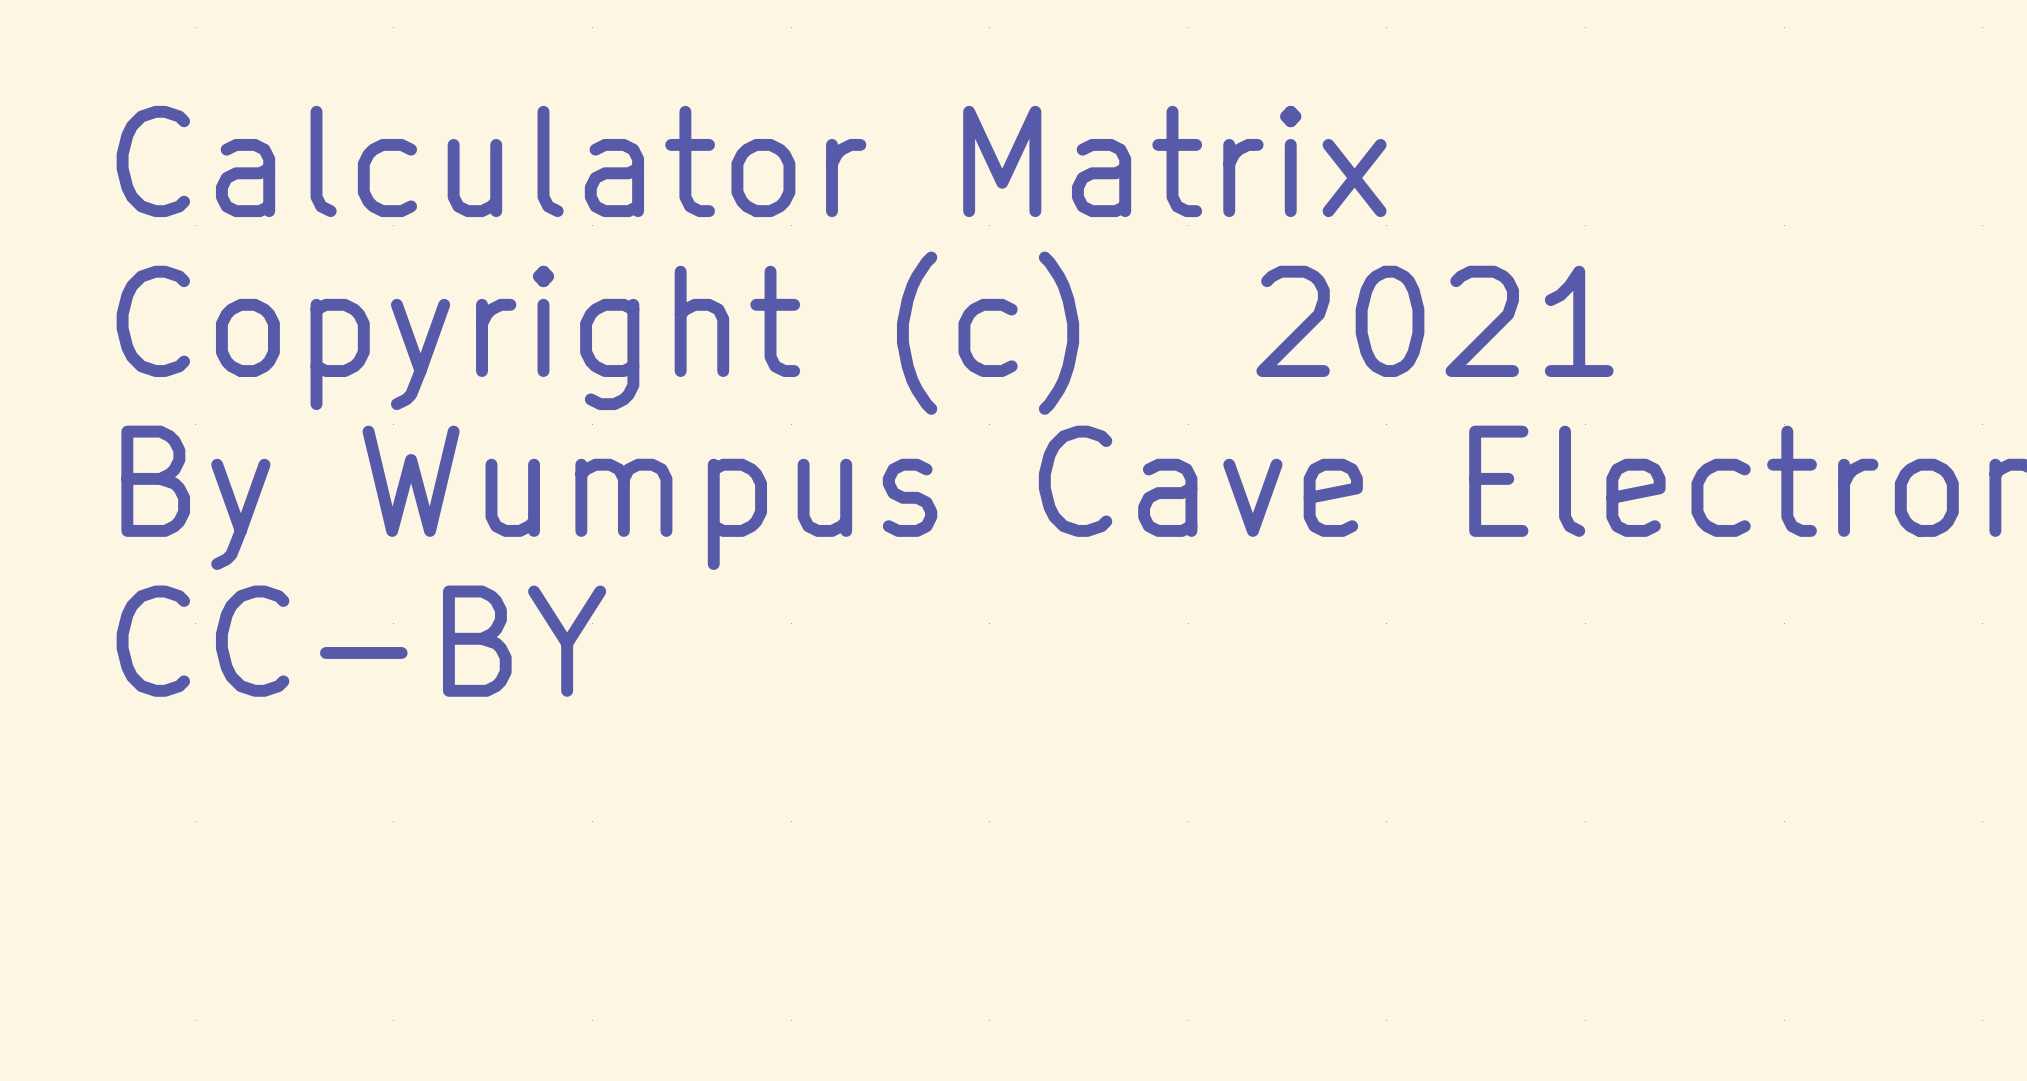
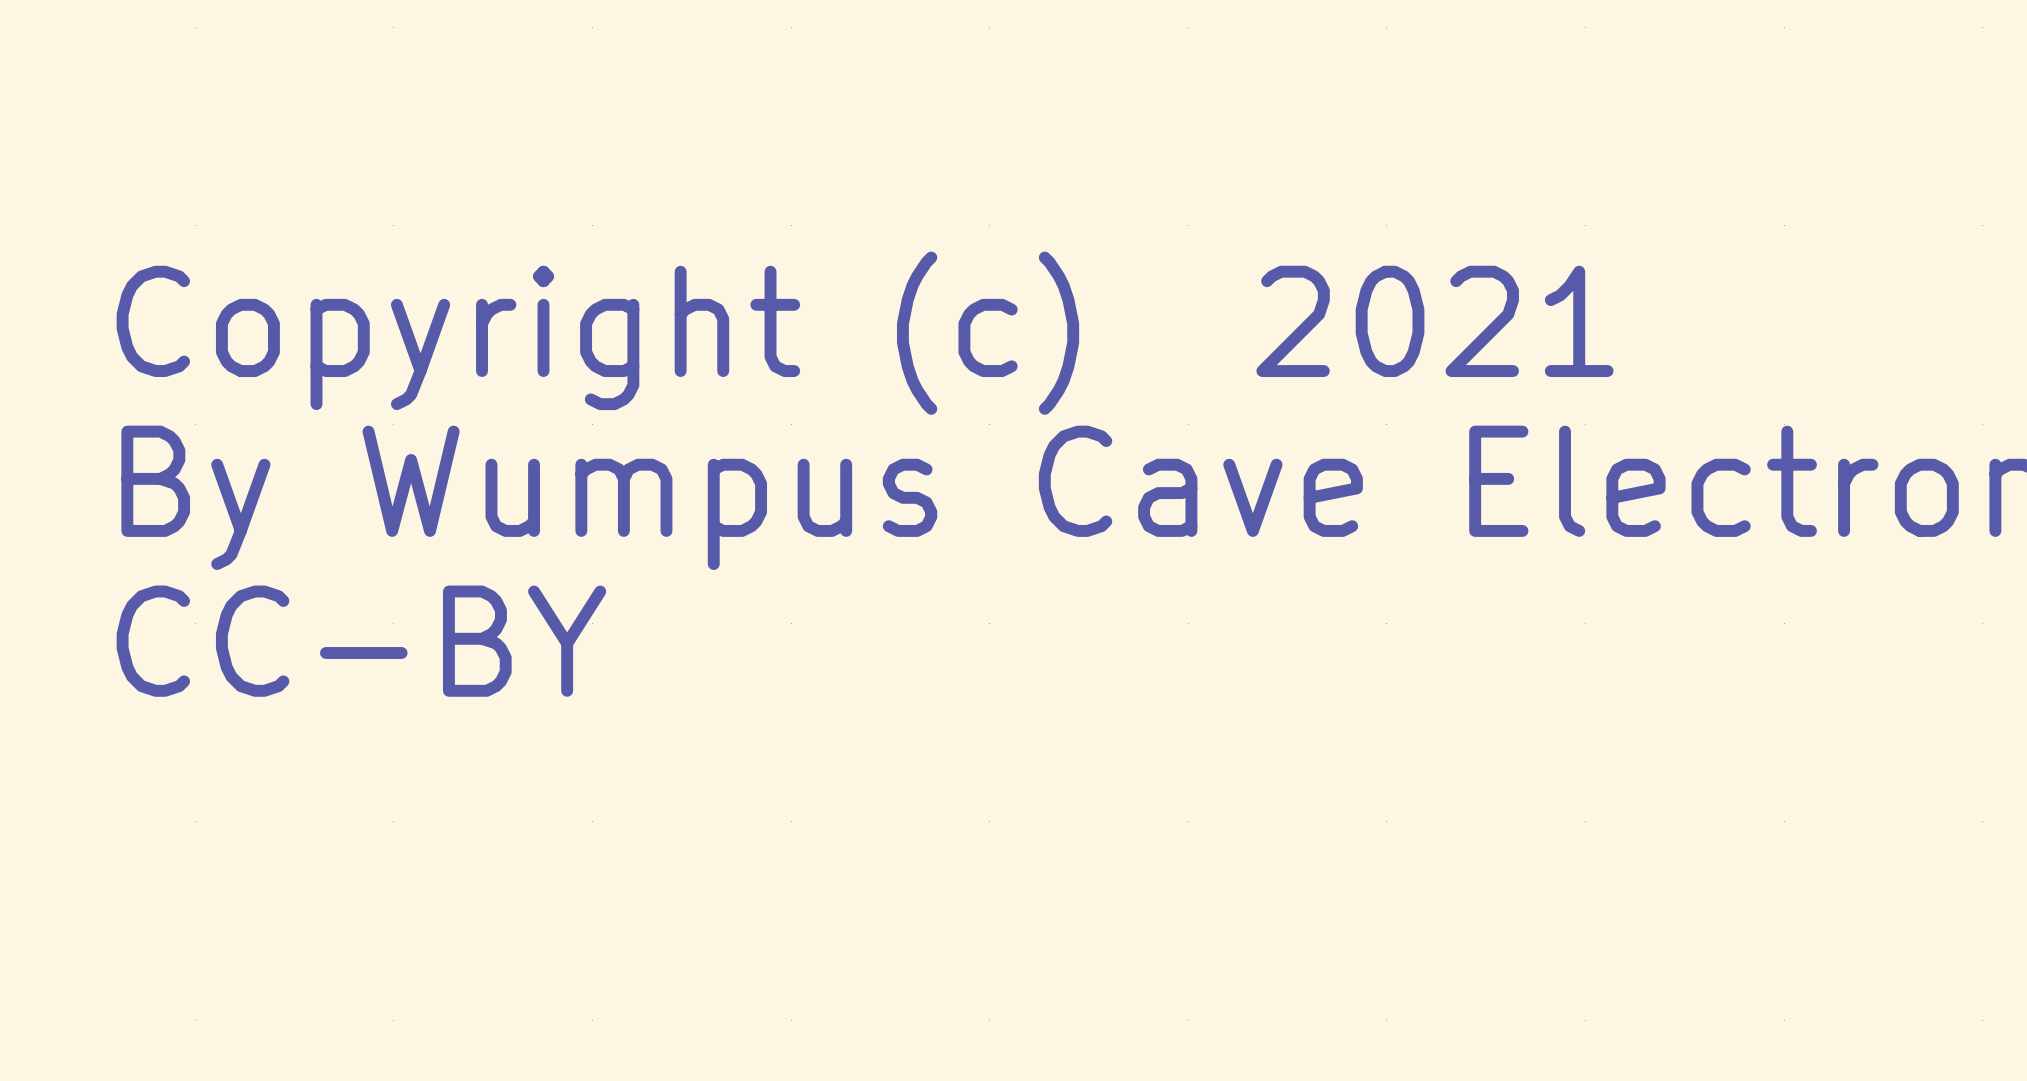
text: Calculator Matrix (751, 161) -> none

